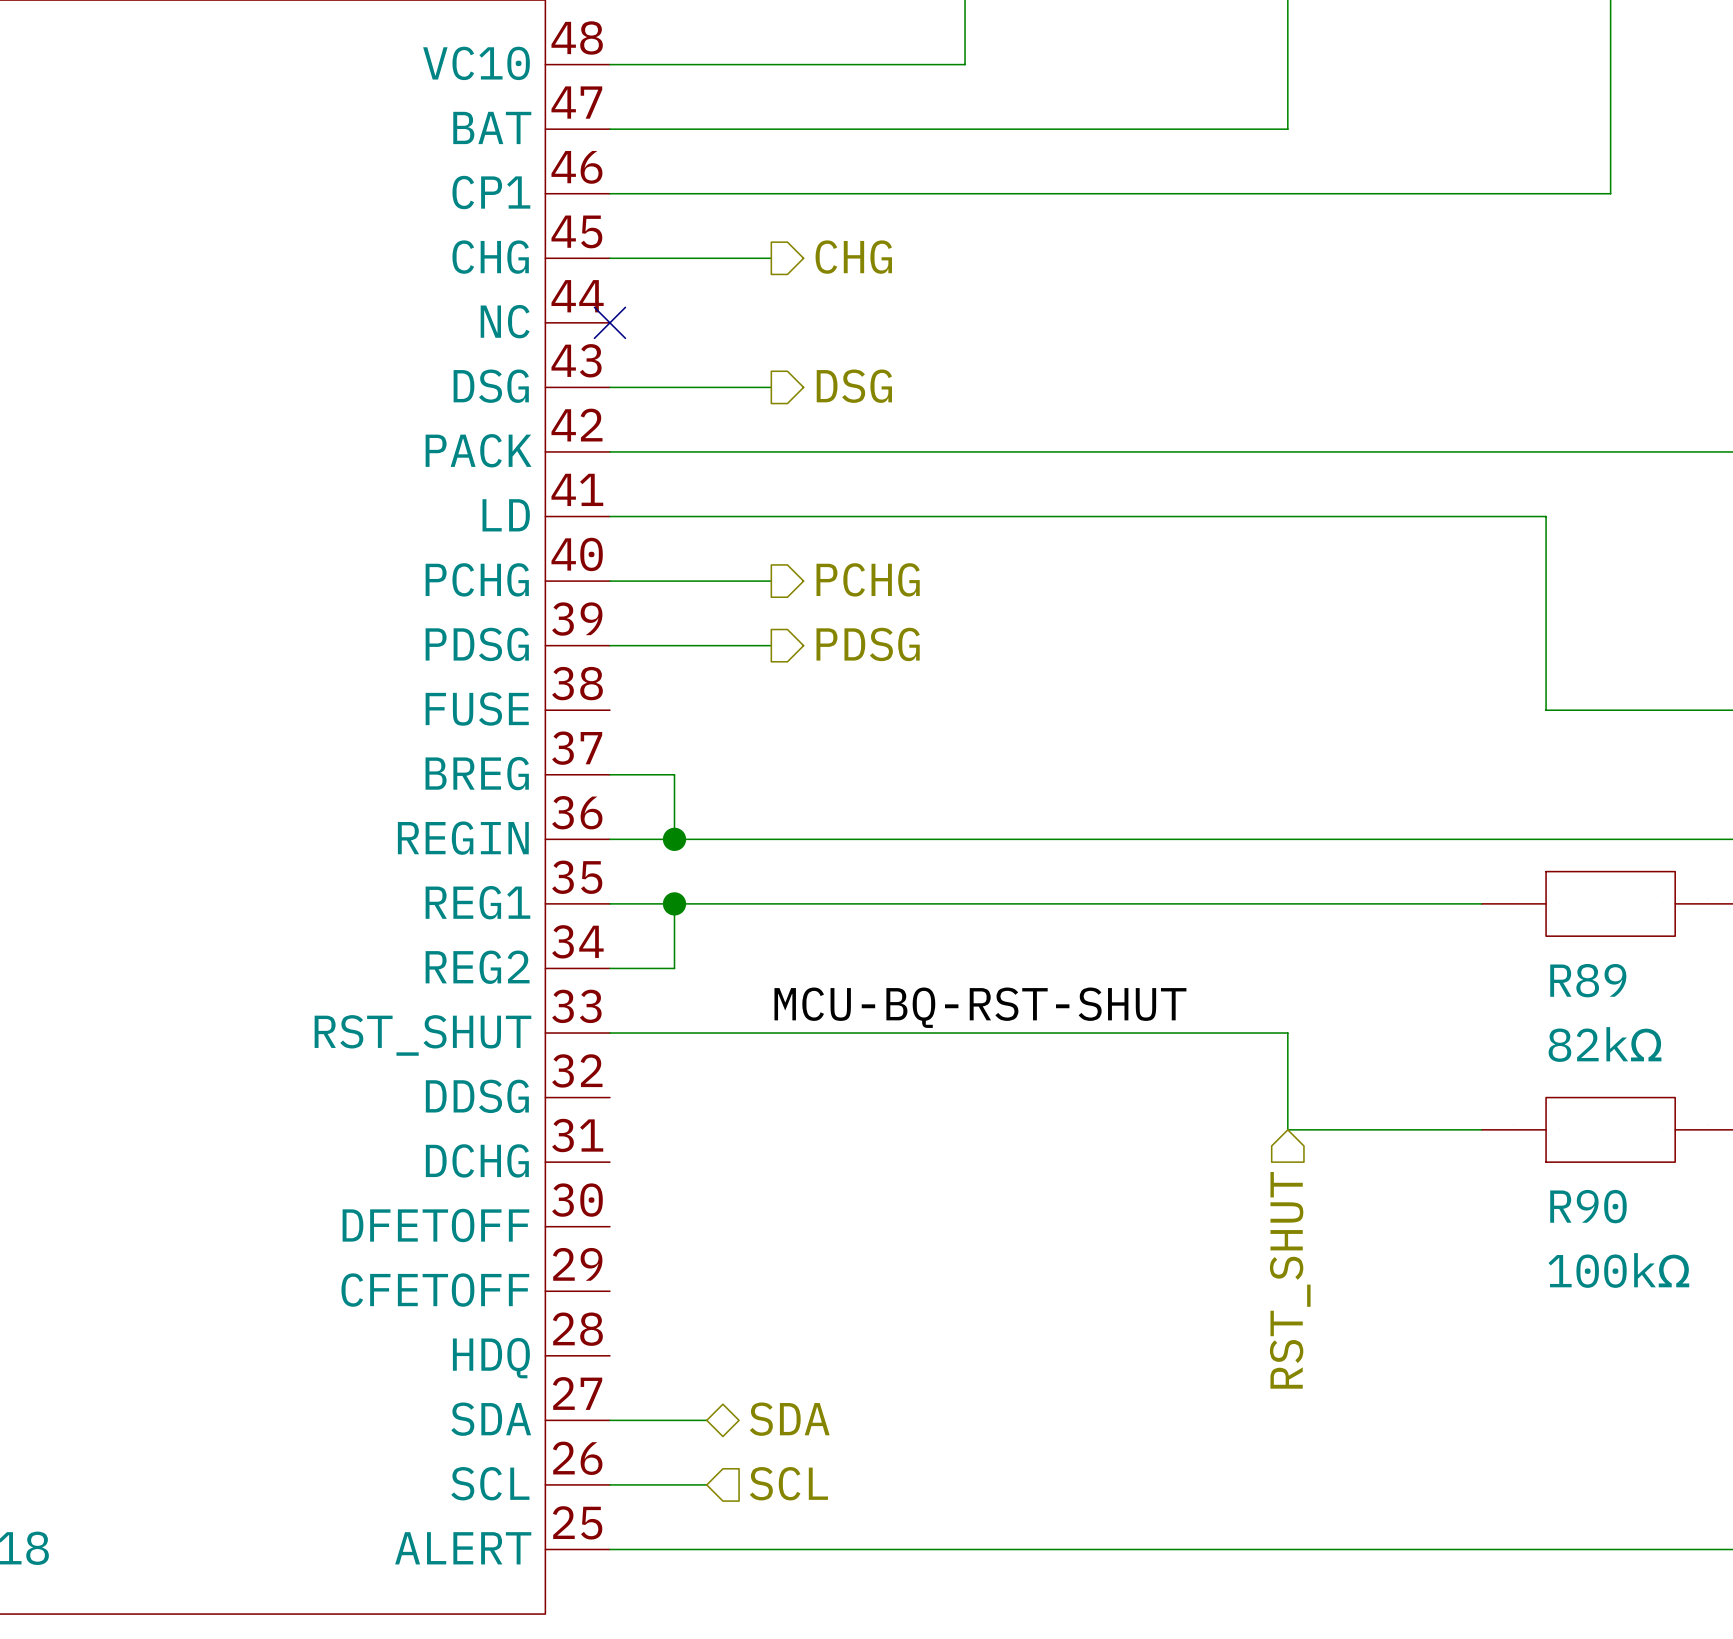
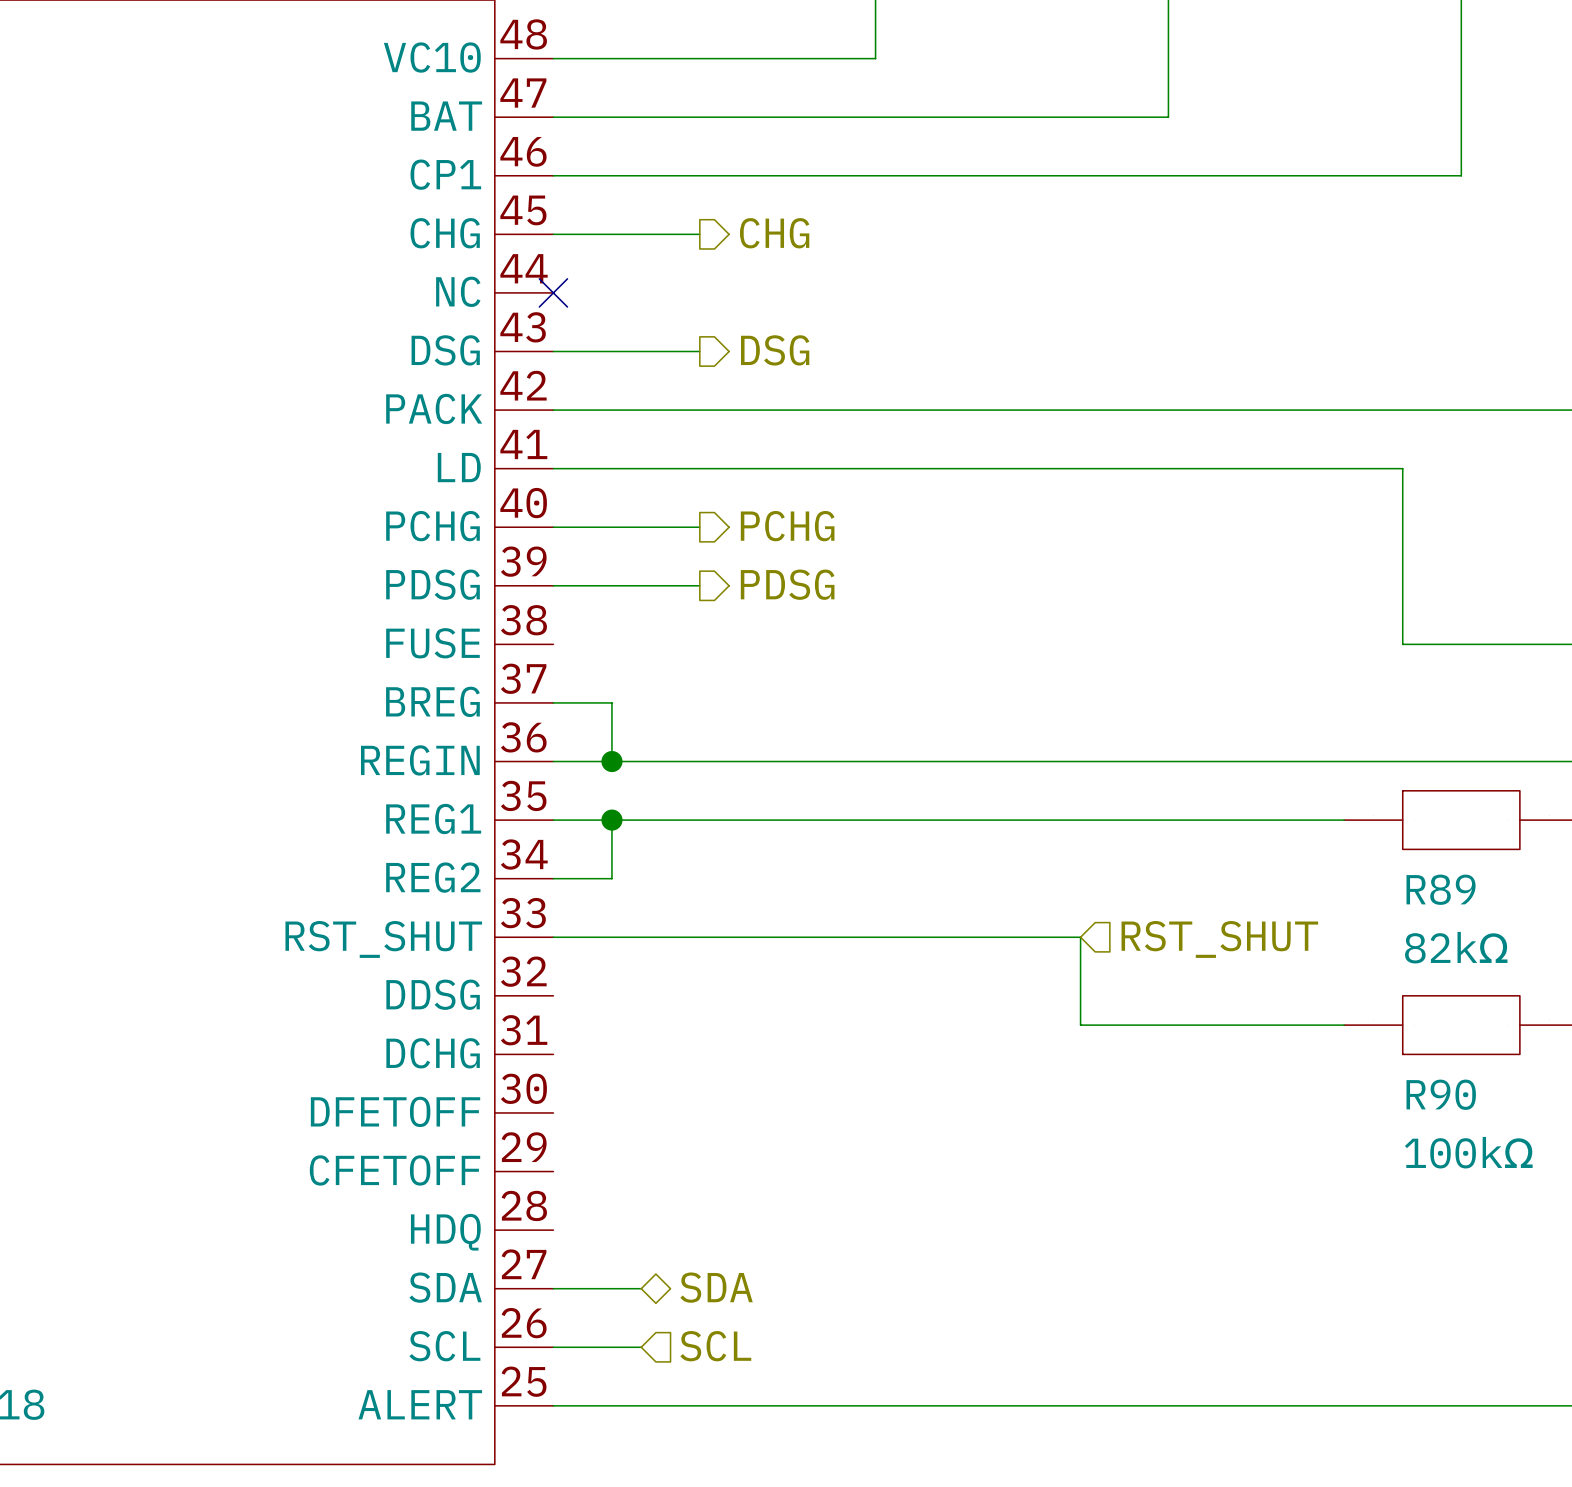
label: MCU-BQ-RST-SHUT (980, 1007) -> none
wire: (1190, 1033) (1287, 1033) (1287, 1129) -> (1080, 937) (1080, 1025) (1168, 1025)
hierarchical label rotation: 0° (1290, 1280) -> 90° counterclockwise (1219, 939)
hierarchical label position: RST_SHUT (1290, 1280) -> RST_SHUT (1219, 939)

